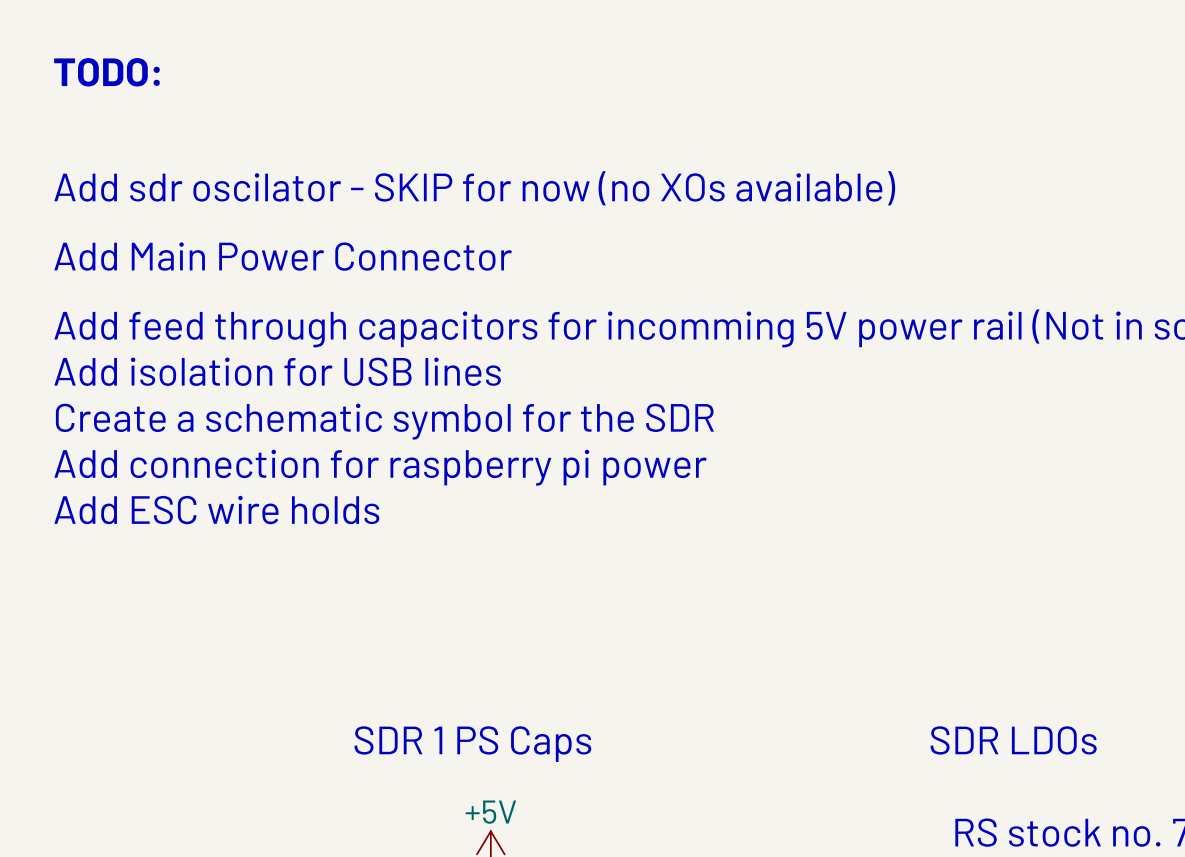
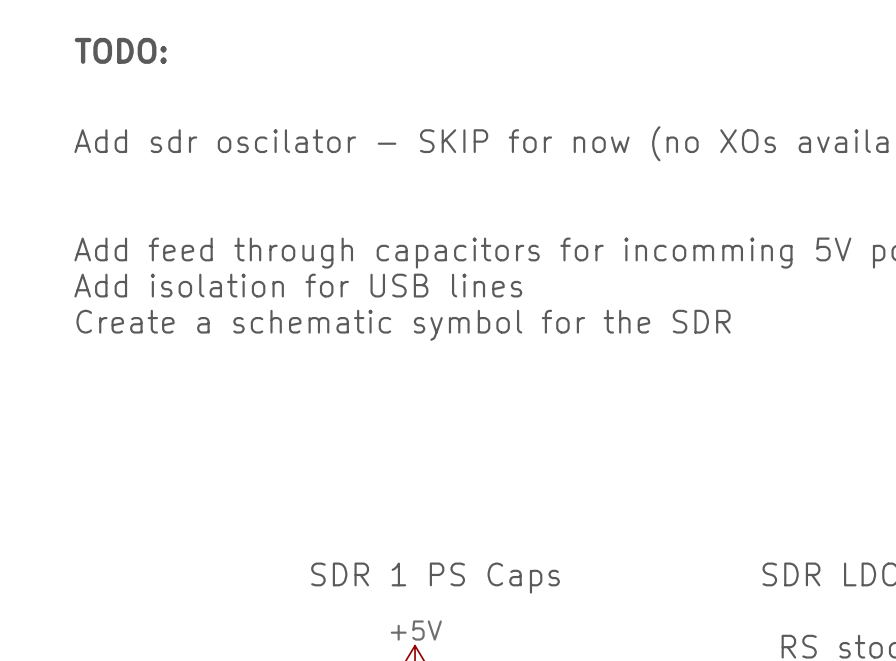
text: Add Main Power Connector (283, 256) -> none
text: Add connection for raspberry pi power (380, 467) -> none
text: Add ESC wire holds (216, 510) -> none

